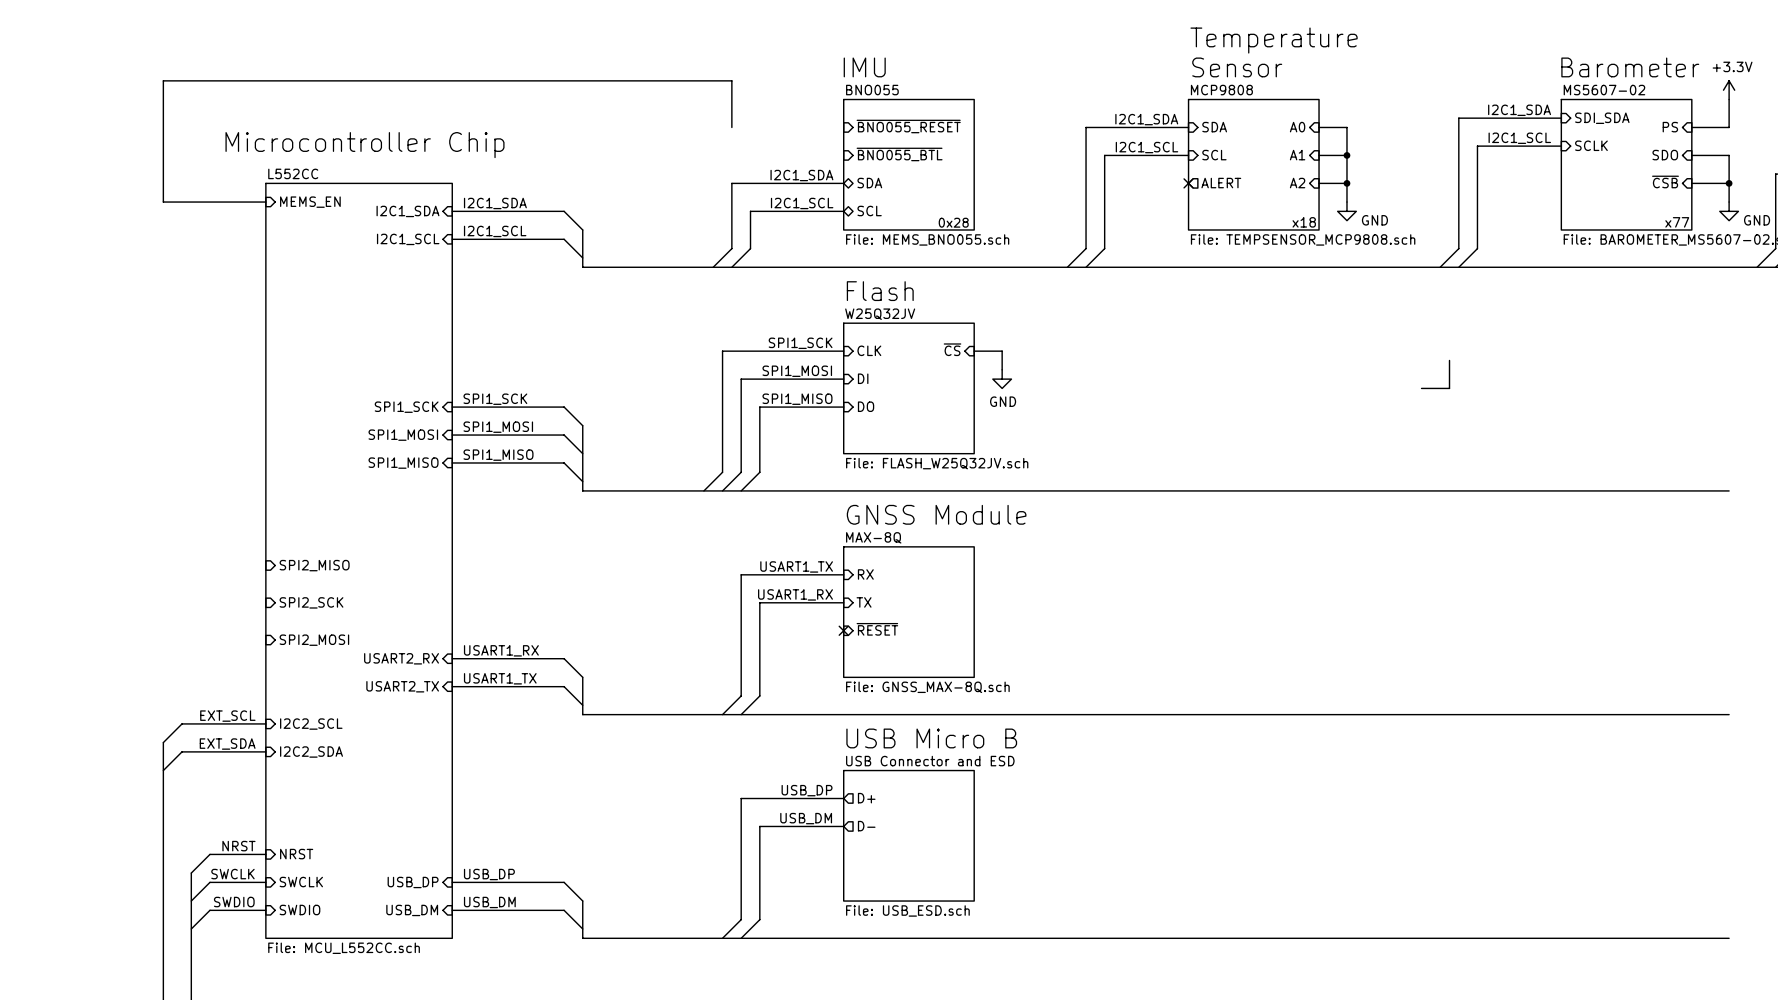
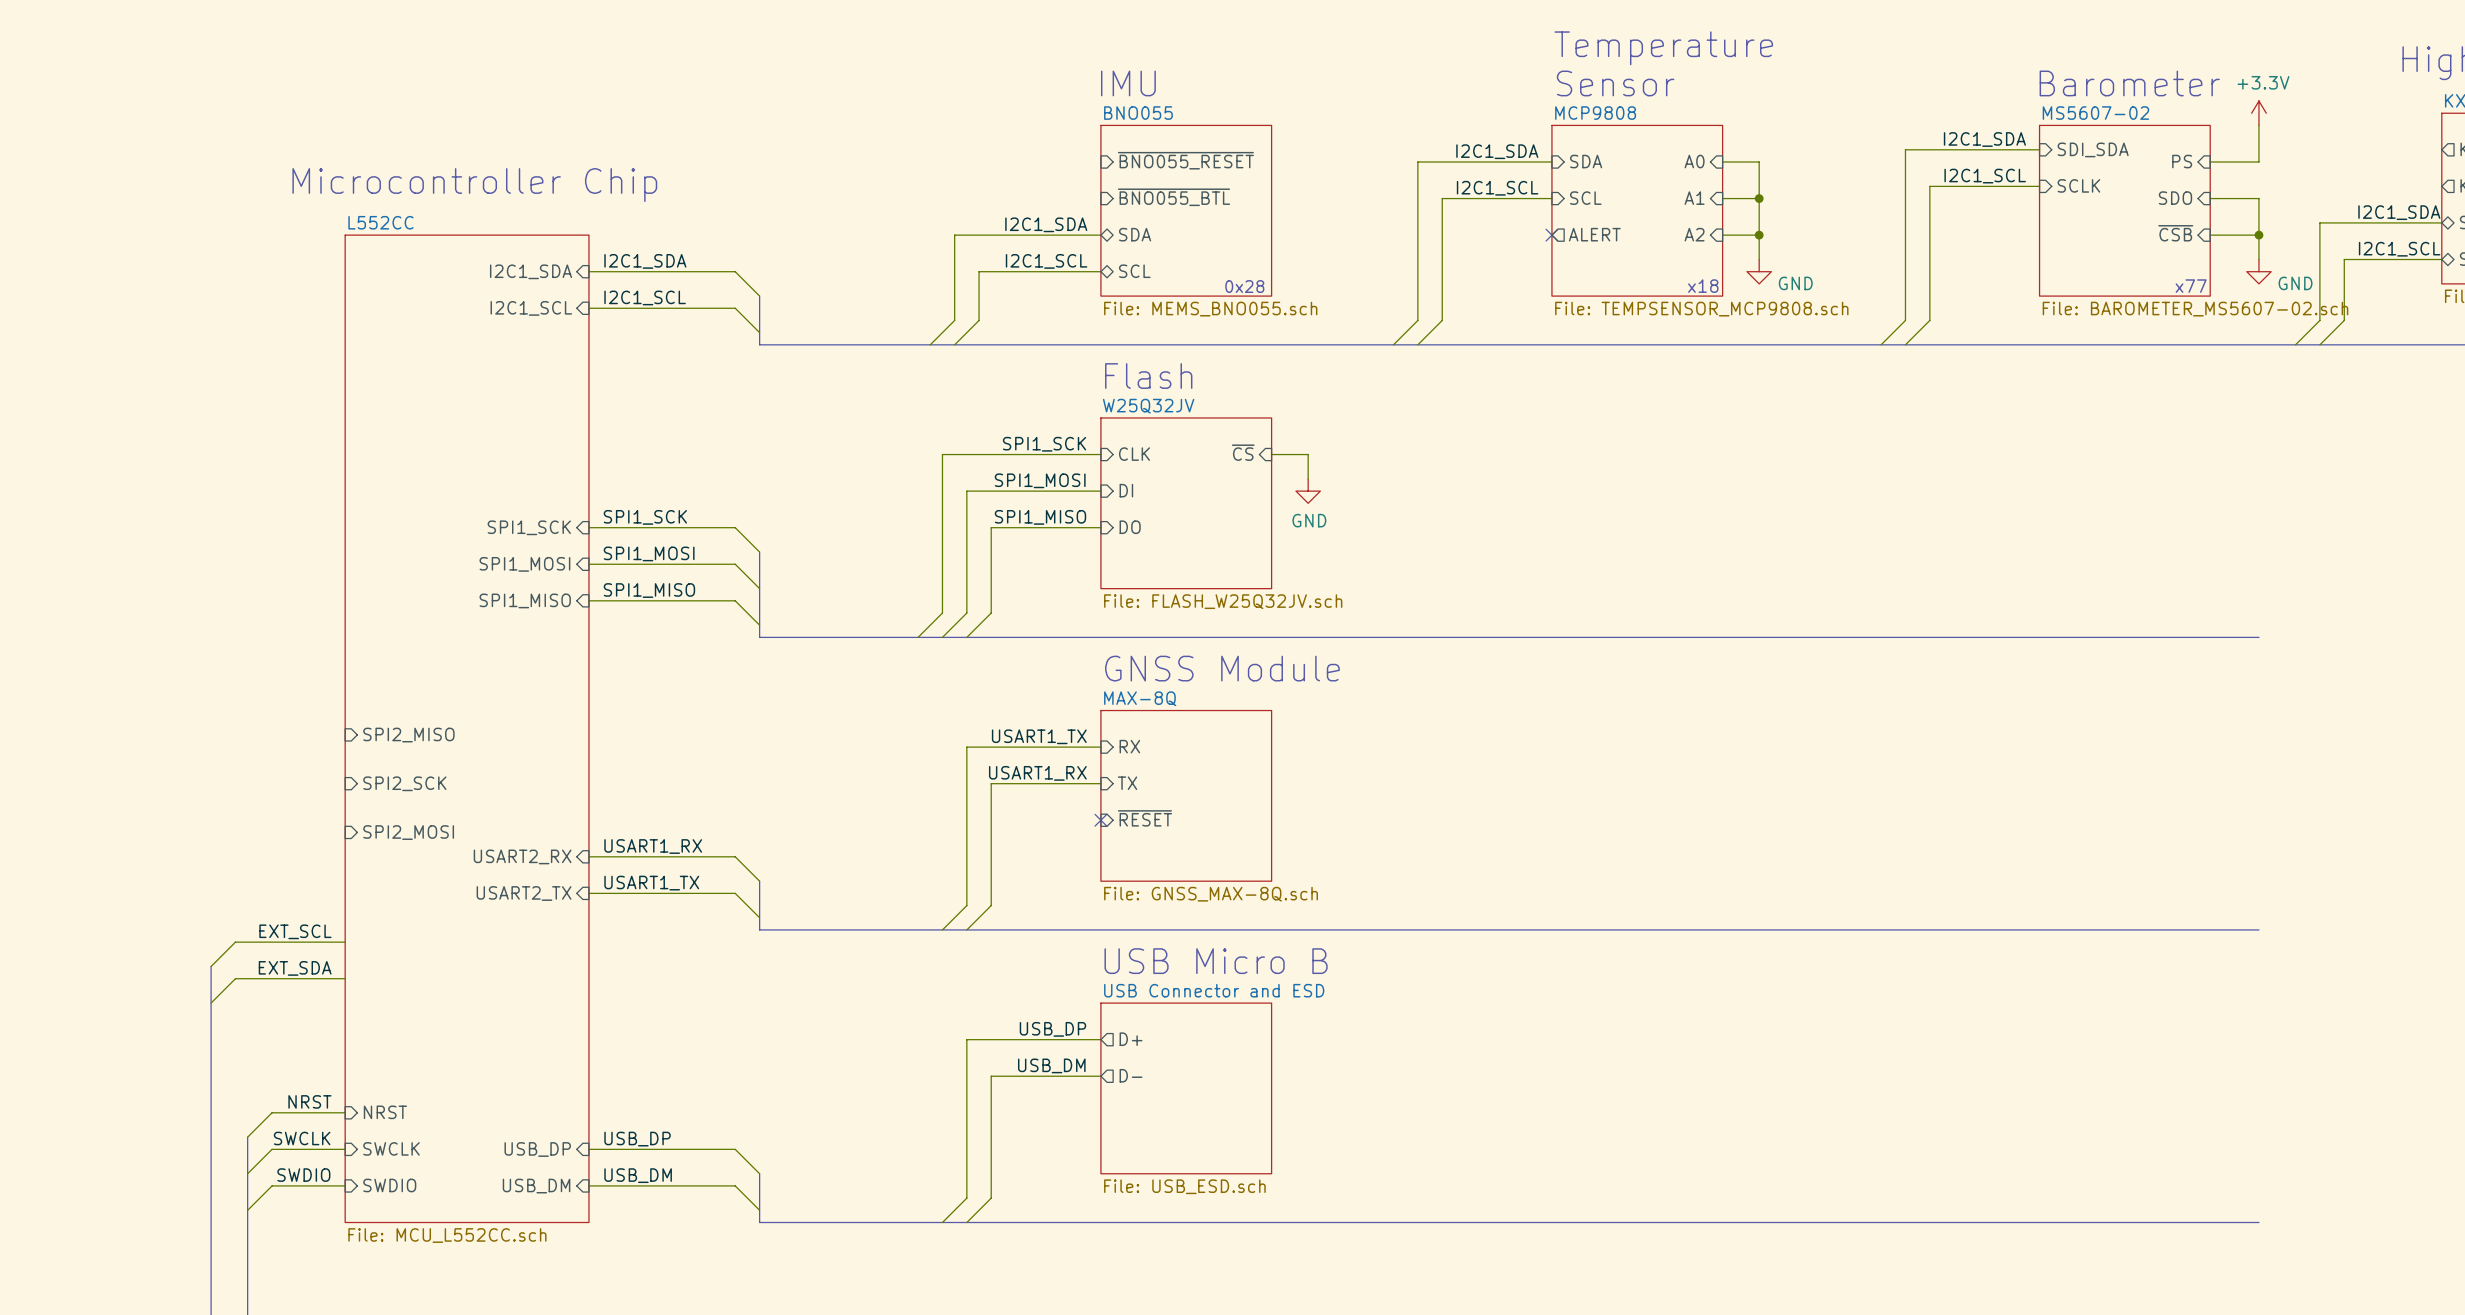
wire: (731, 127) (731, 80) (163, 80) (163, 202) (265, 202) -> none
sheet pin: MEMS_EN (310, 202) -> none
bus: (1449, 360) (1449, 388) (1421, 388) -> none
sheet pin: I2C2_SCL (311, 724) -> none
sheet pin: I2C2_SDA (311, 752) -> none

